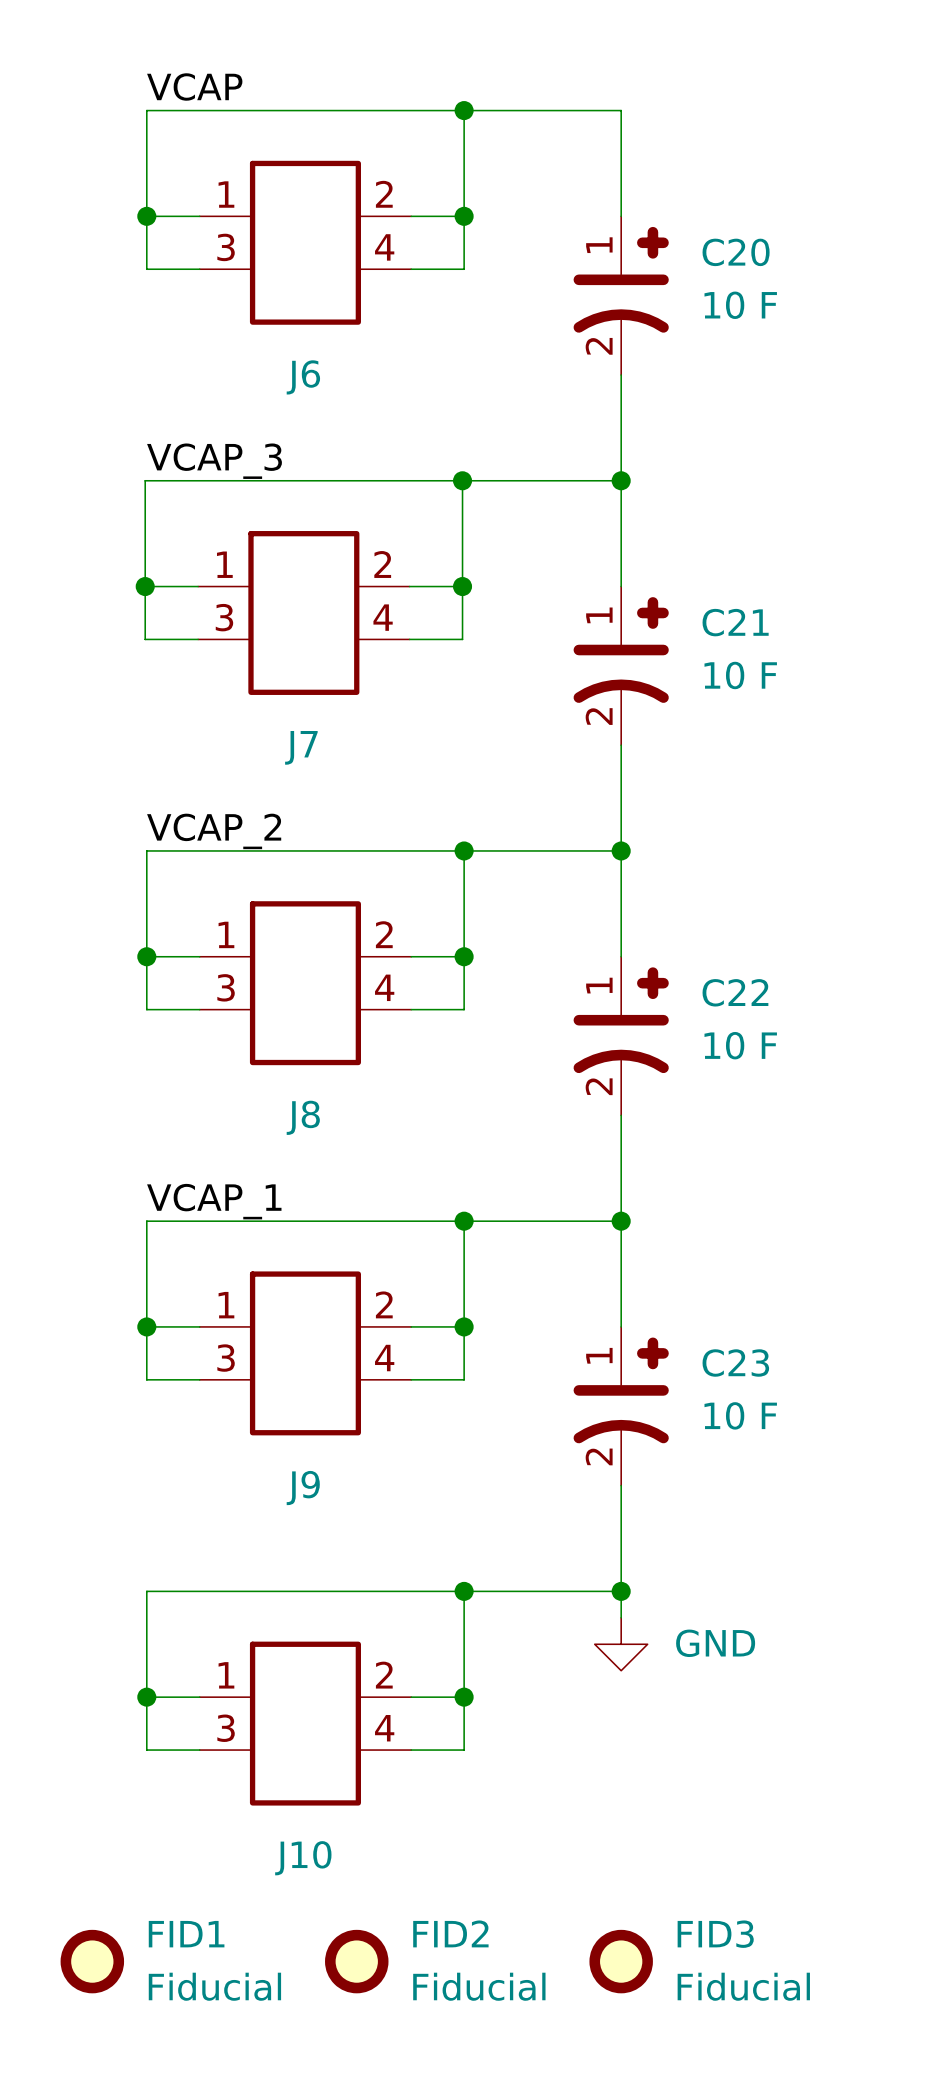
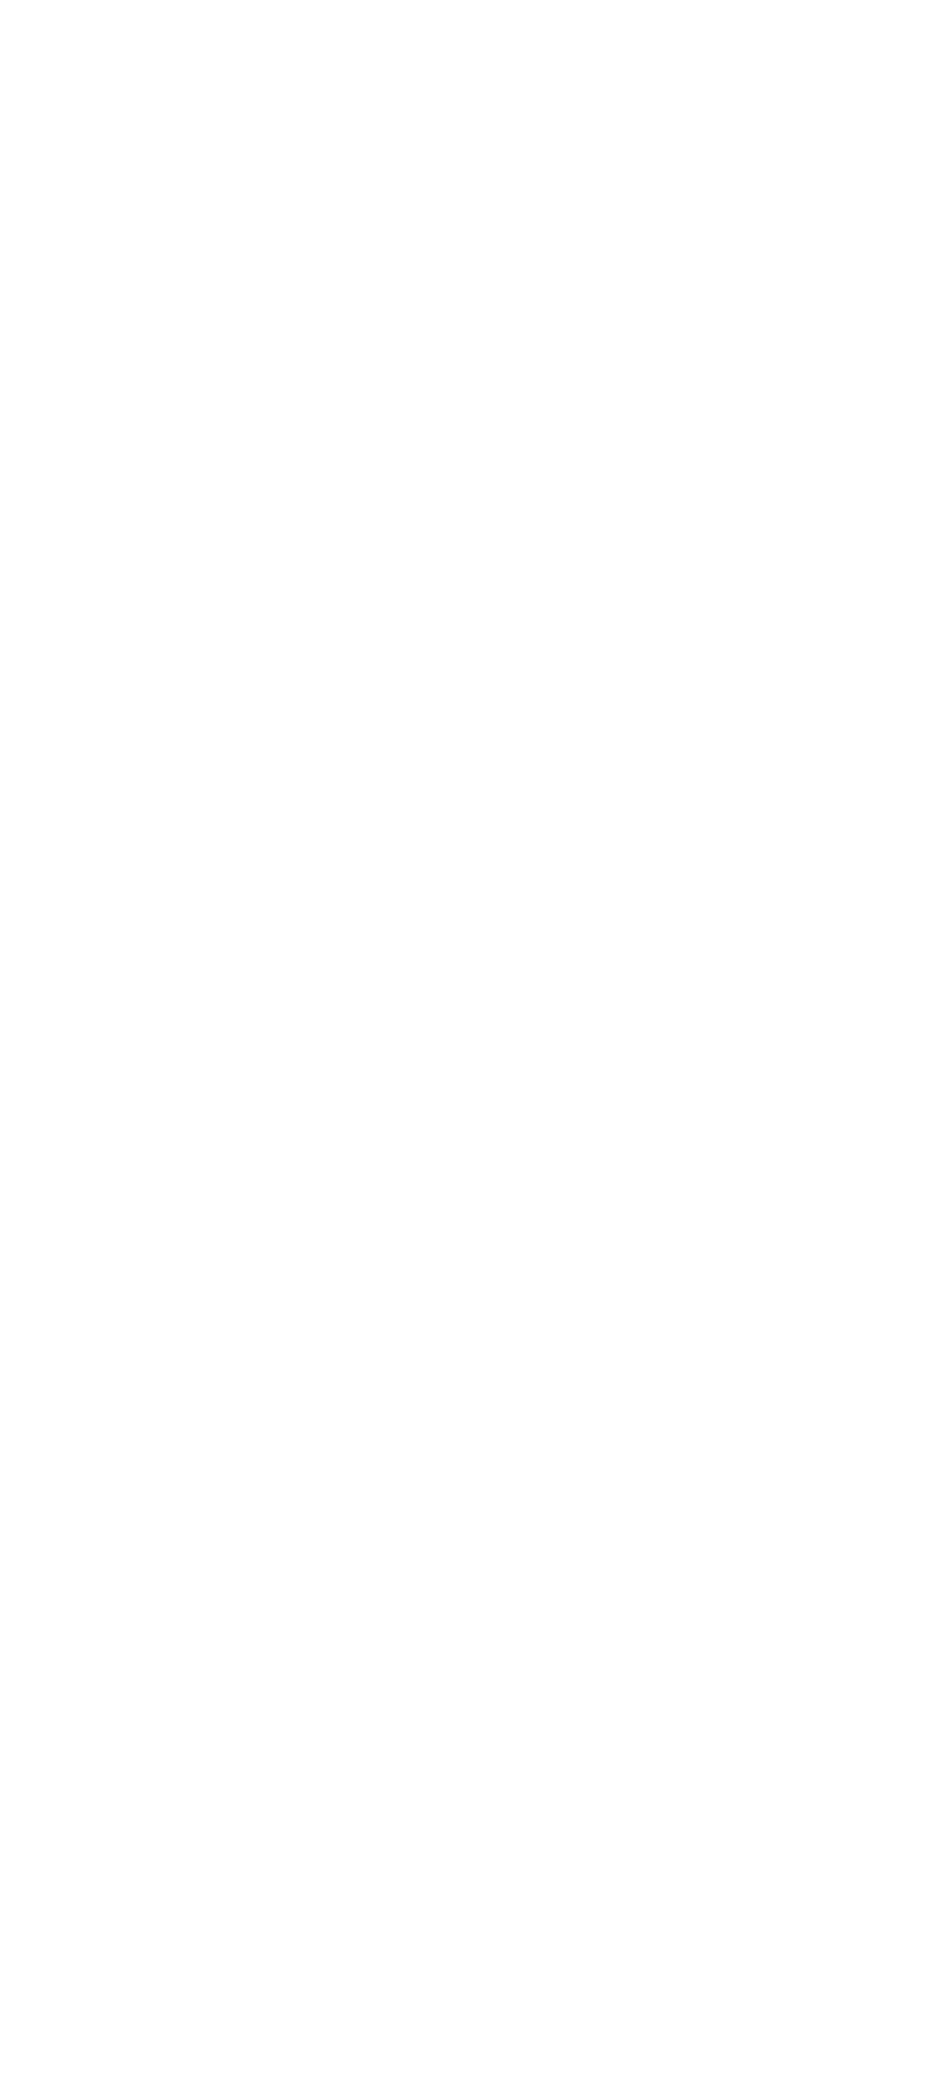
label: VCAP (194, 86) -> none
wire: (464, 110) (464, 269) (411, 269) -> none
junction: (464, 110) -> none
wire: (146, 216) (199, 216) -> none
junction: (146, 216) -> none
wire: (411, 216) (464, 216) -> none
junction: (464, 216) -> none
wire: (621, 216) (621, 110) (146, 110) (146, 269) (199, 269) -> none
J6: (305, 242) -> none
C20: 10 F (621, 295) -> none
wire: (621, 375) (621, 586) -> none
label: VCAP_3 (214, 461) -> none
wire: (462, 480) (462, 639) (409, 639) -> none
junction: (462, 480) -> none
wire: (621, 480) (145, 480) (145, 639) (198, 639) -> none
junction: (621, 480) -> none
wire: (145, 586) (198, 586) -> none
junction: (145, 586) -> none
wire: (409, 586) (462, 586) -> none
junction: (462, 586) -> none
J7: (303, 612) -> none
C21: 10 F (621, 665) -> none
wire: (621, 745) (621, 956) -> none
label: VCAP_2 (214, 831) -> none
wire: (464, 850) (464, 1009) (411, 1009) -> none
junction: (464, 850) -> none
wire: (621, 850) (146, 850) (146, 1009) (199, 1009) -> none
junction: (621, 850) -> none
wire: (146, 956) (199, 956) -> none
junction: (146, 956) -> none
wire: (411, 956) (464, 956) -> none
junction: (464, 956) -> none
J8: (305, 983) -> none
C22: 10 F (621, 1036) -> none
wire: (621, 1115) (621, 1326) -> none
label: VCAP_1 (214, 1201) -> none
wire: (464, 1221) (464, 1379) (411, 1379) -> none
junction: (464, 1221) -> none
wire: (621, 1221) (146, 1221) (146, 1379) (199, 1379) -> none
junction: (621, 1221) -> none
wire: (146, 1326) (199, 1326) -> none
junction: (146, 1326) -> none
wire: (411, 1326) (464, 1326) -> none
junction: (464, 1326) -> none
J9: (305, 1353) -> none
C23: 10 F (621, 1406) -> none
wire: (621, 1485) (621, 1617) -> none
wire: (464, 1591) (464, 1750) (411, 1750) -> none
junction: (464, 1591) -> none
wire: (621, 1591) (146, 1591) (146, 1750) (199, 1750) -> none
junction: (621, 1591) -> none
power symbol: GND (621, 1644) -> none
wire: (146, 1697) (199, 1697) -> none
junction: (146, 1697) -> none
wire: (411, 1697) (464, 1697) -> none
junction: (464, 1697) -> none
J10: (305, 1723) -> none
FID1: Fiducial (92, 1961) -> none
FID2: Fiducial (356, 1961) -> none
FID3: Fiducial (621, 1961) -> none

